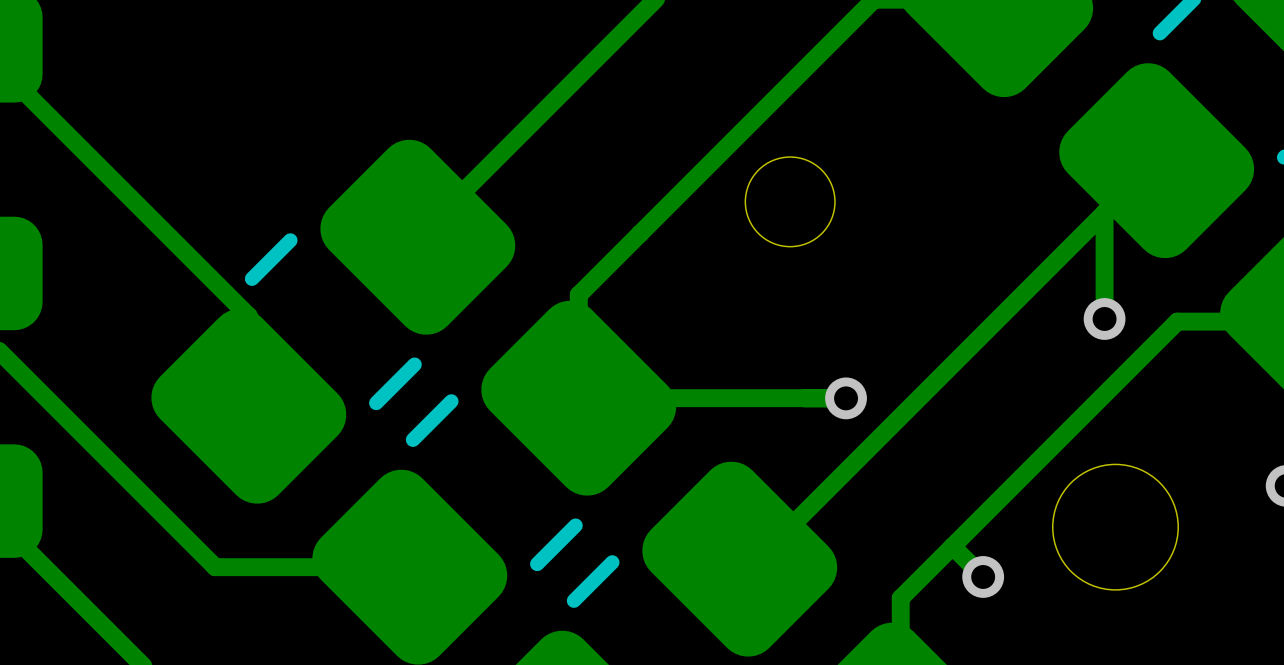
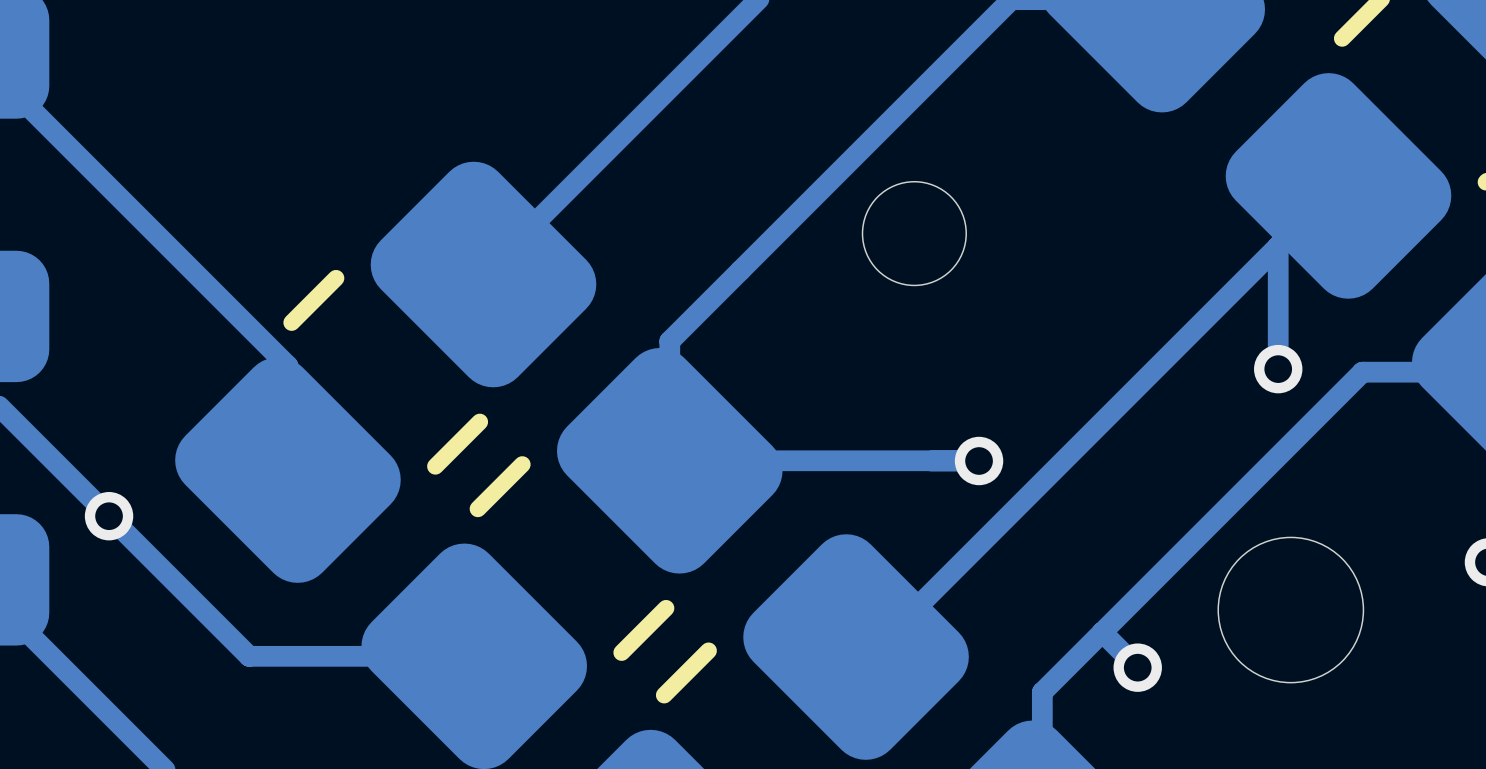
via: none -> (109, 516)

